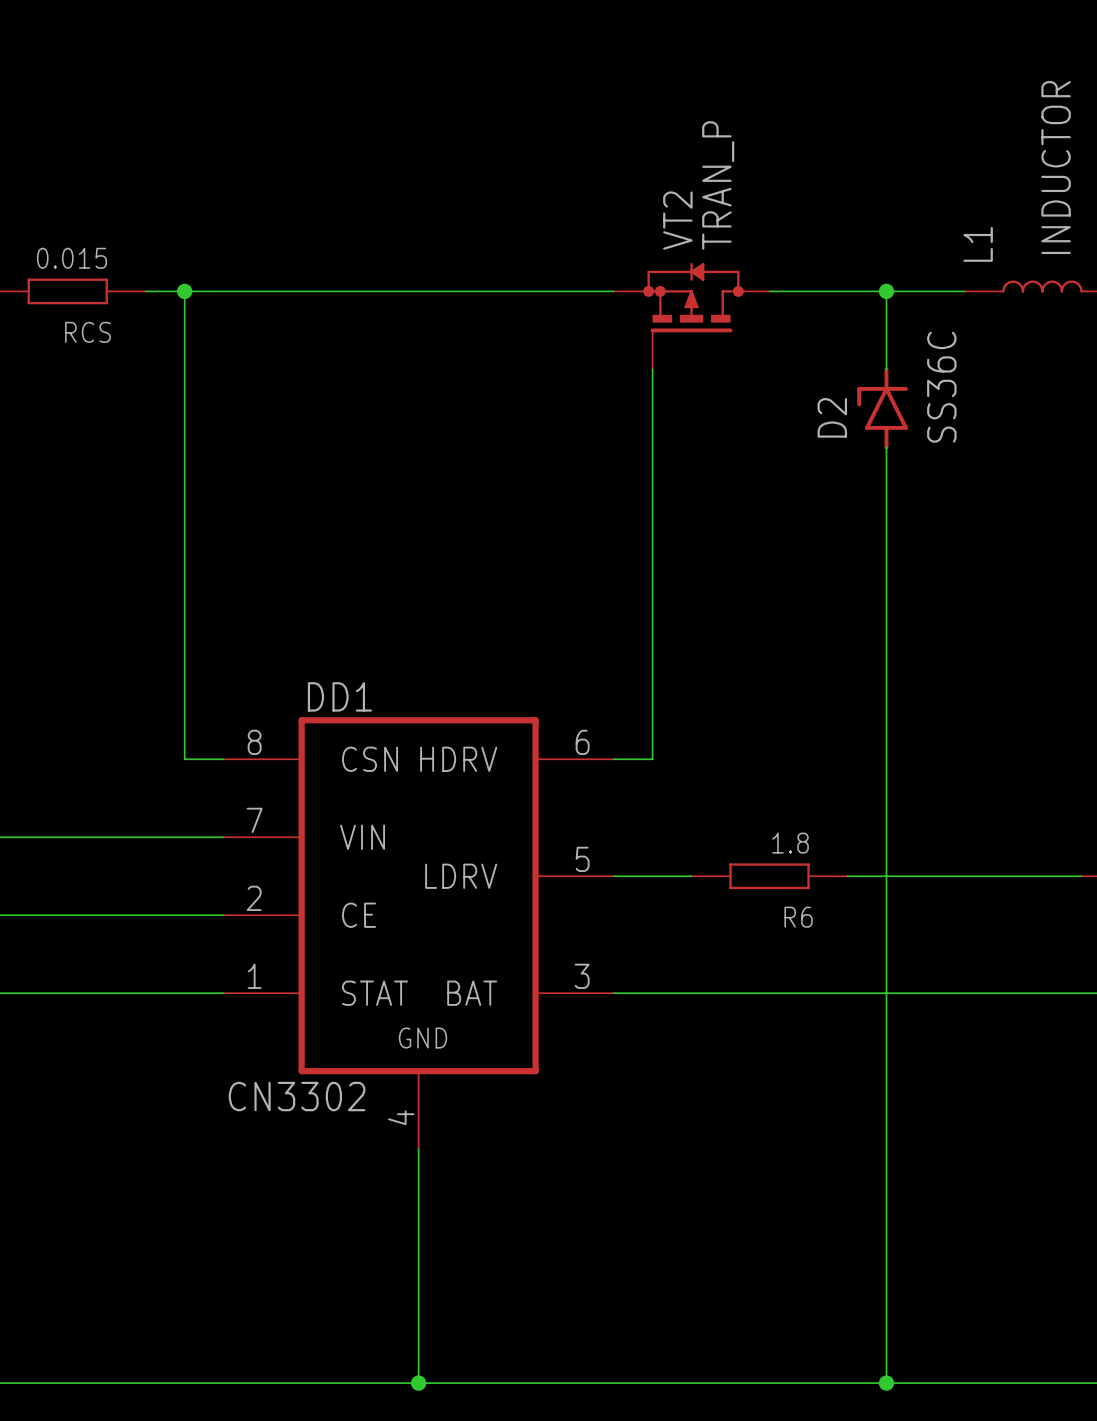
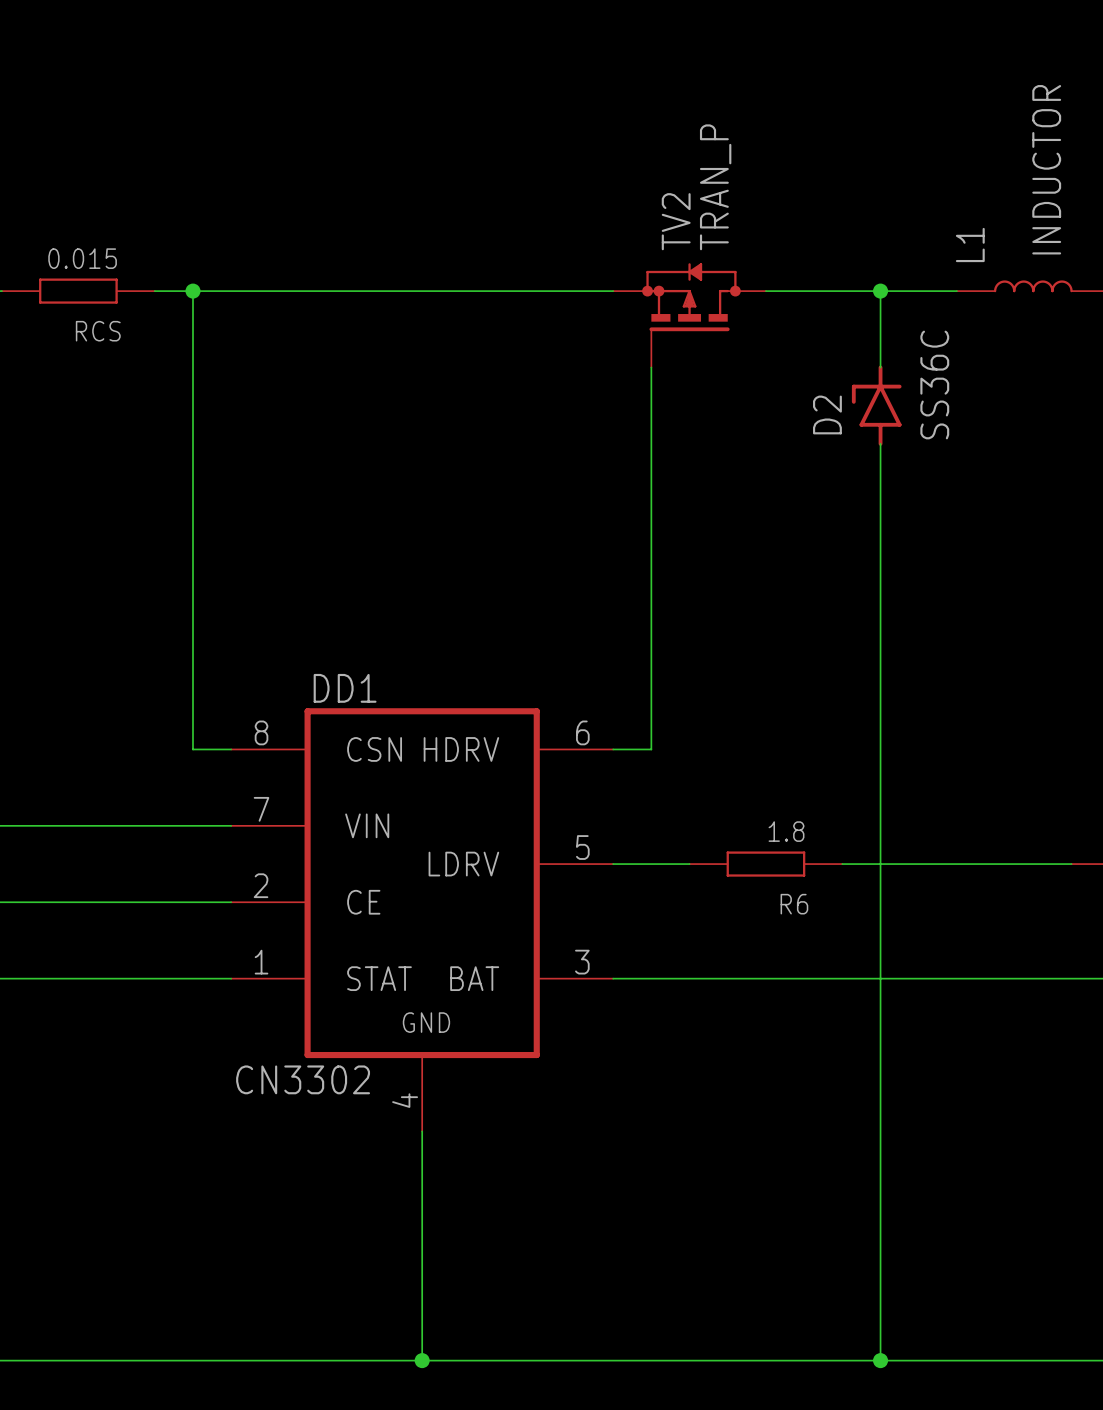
VT2 name: VT2 (677, 220) -> TV2 (676, 221)

